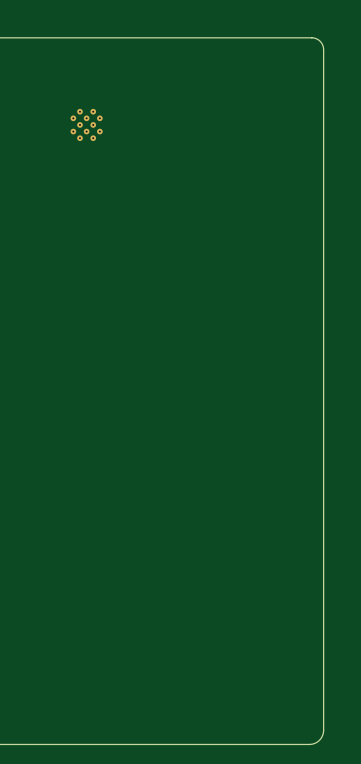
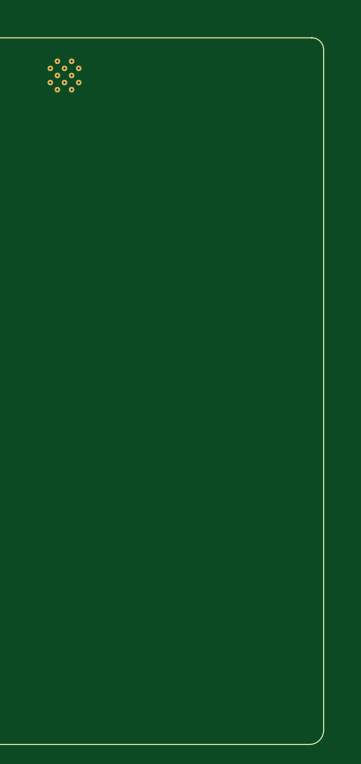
part: none -> (64, 75)
part: (86, 124) -> none

